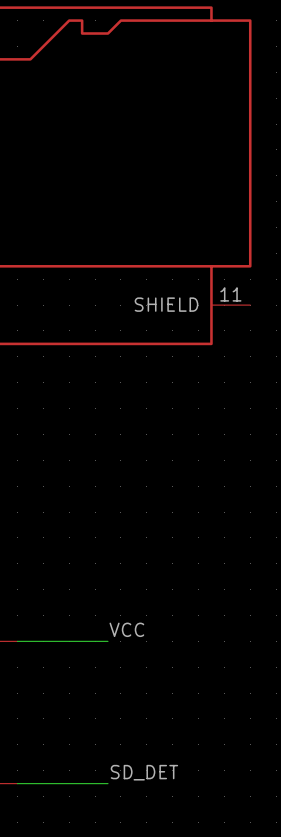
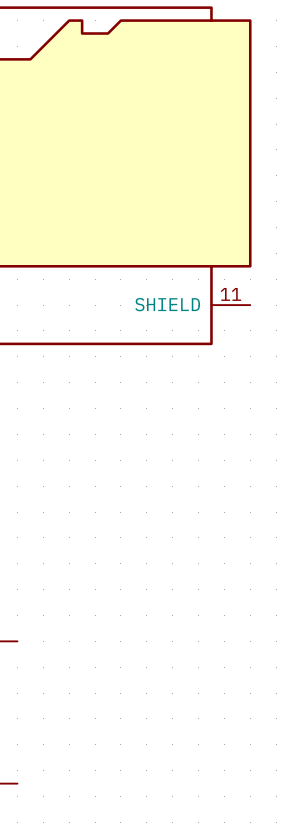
label: VCC (126, 629) -> none
wire: (17, 641) (108, 641) -> none
label: SD_DET (144, 772) -> none
wire: (17, 783) (108, 783) -> none

